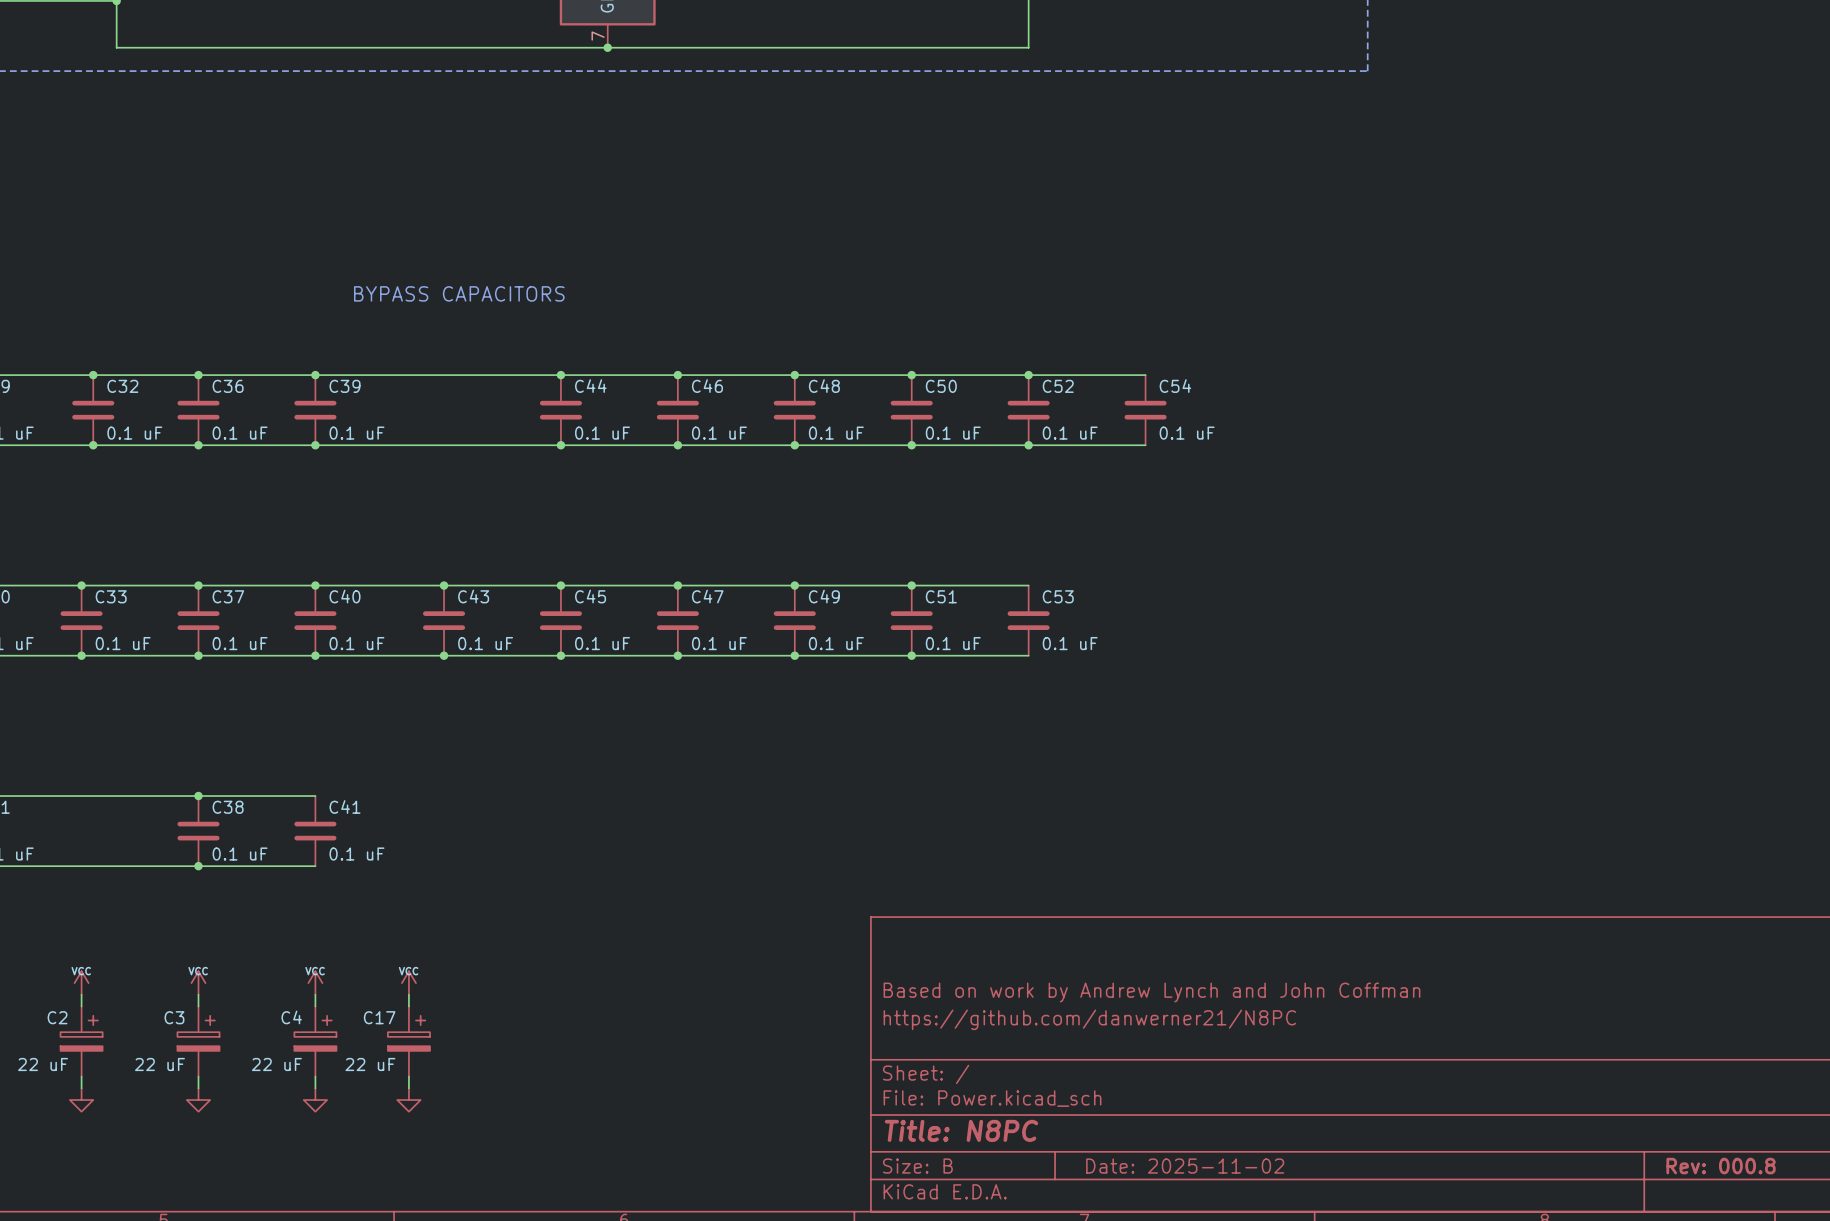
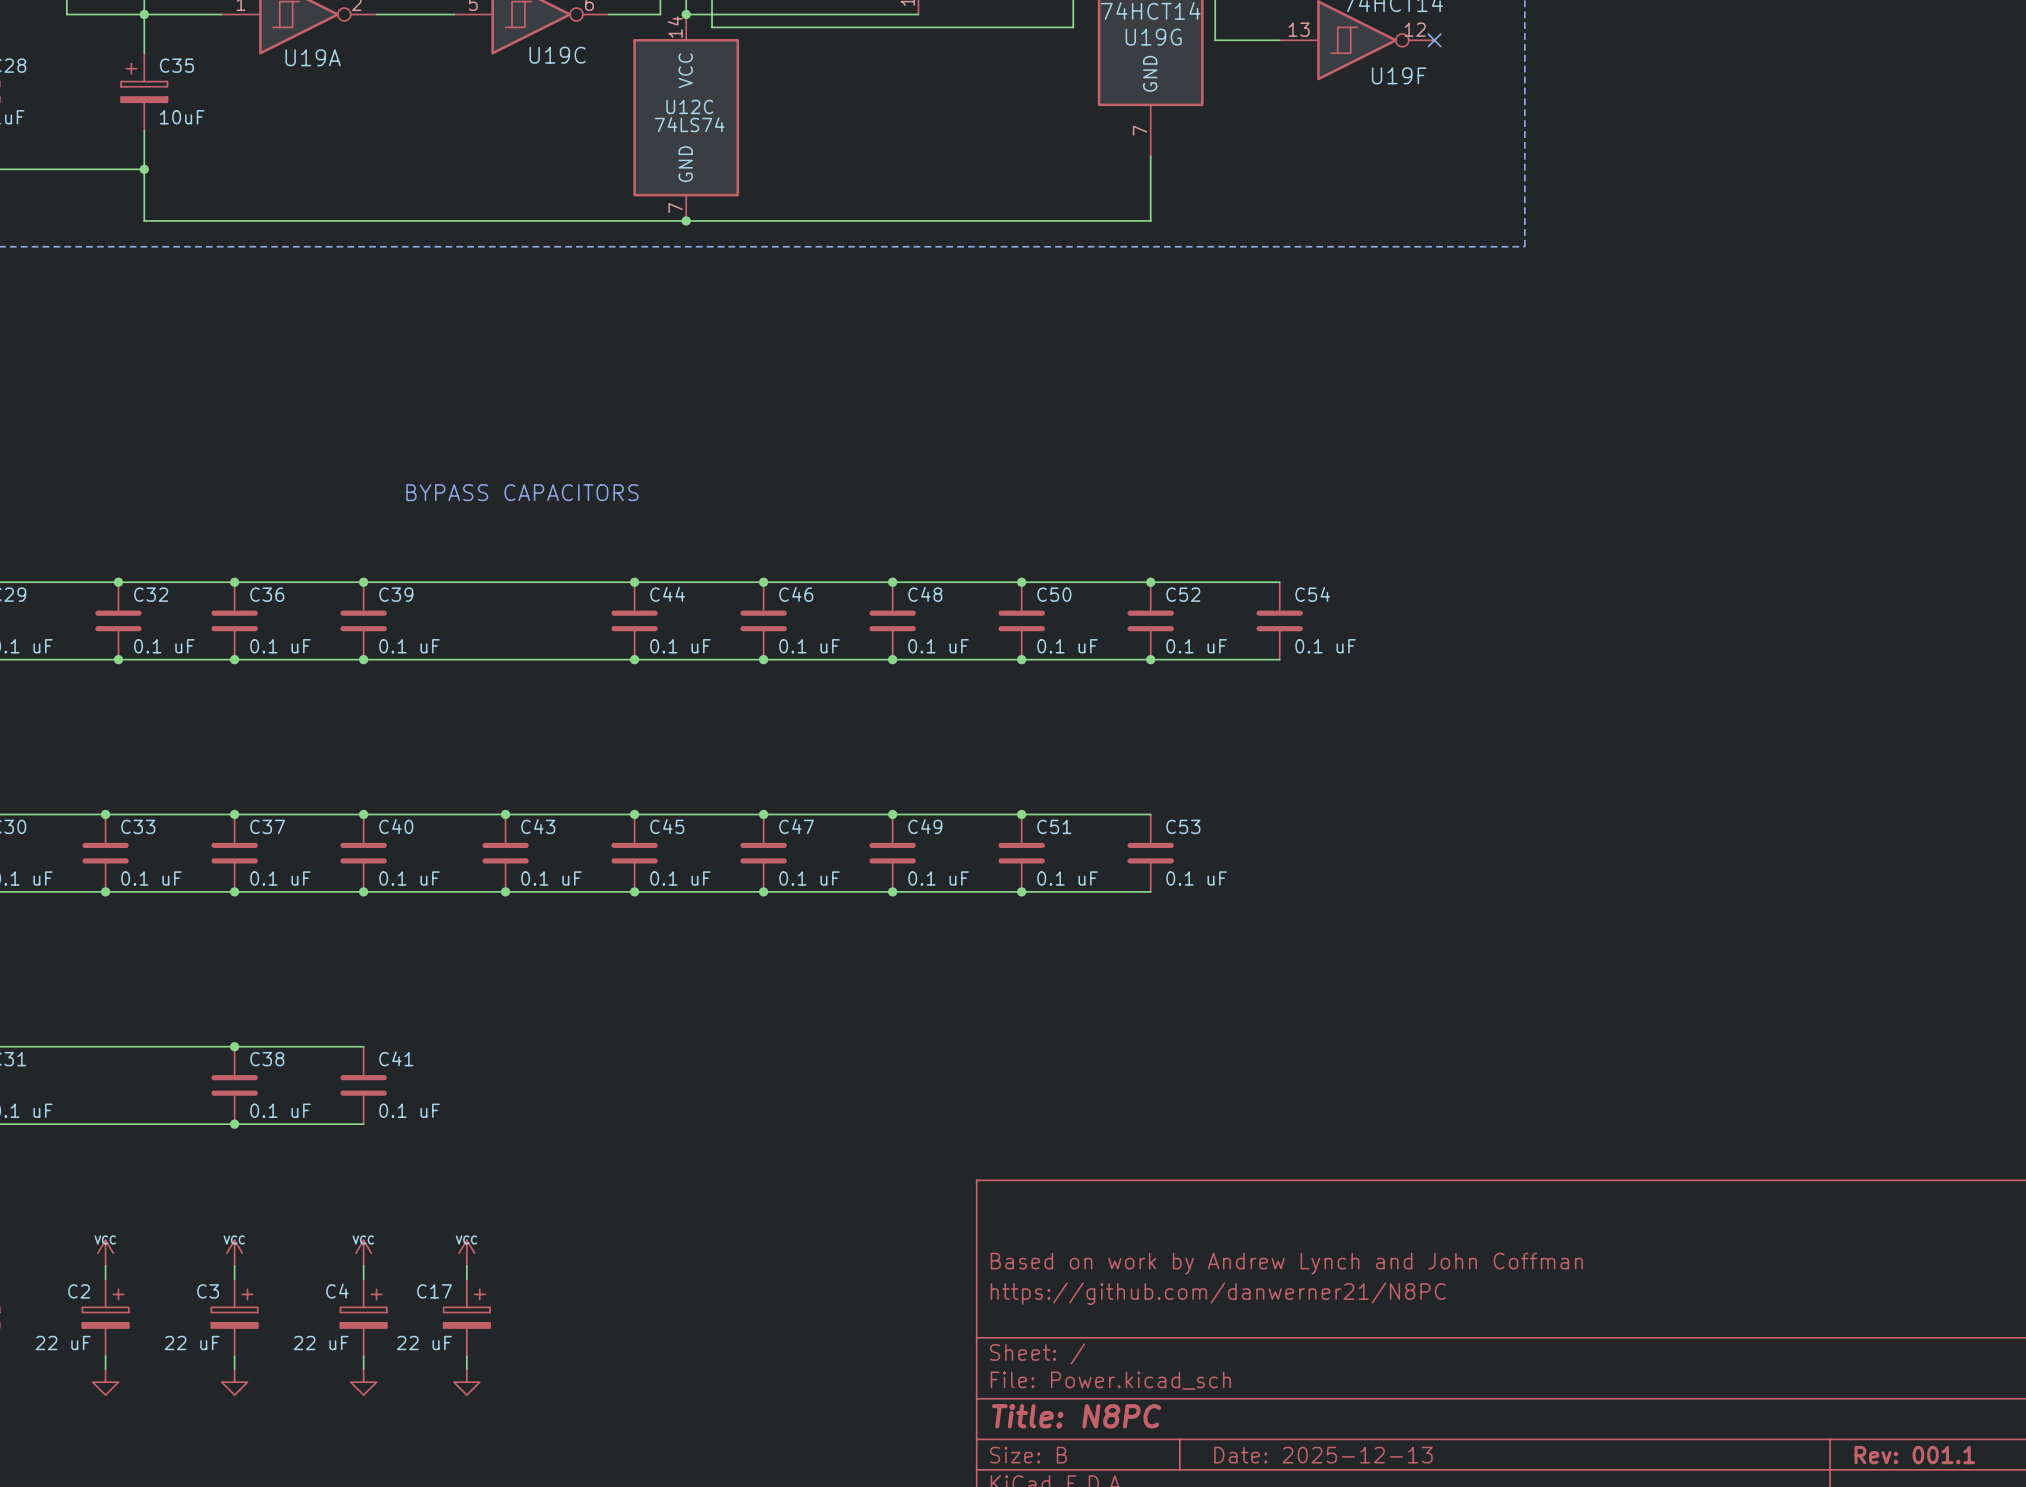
title block: Date: 2025-11-02 (1185, 1166) -> Date: 2025-12-13 (1323, 1455)
title block: Rev: 000.8 (1721, 1166) -> Rev: 001.1 (1914, 1455)

